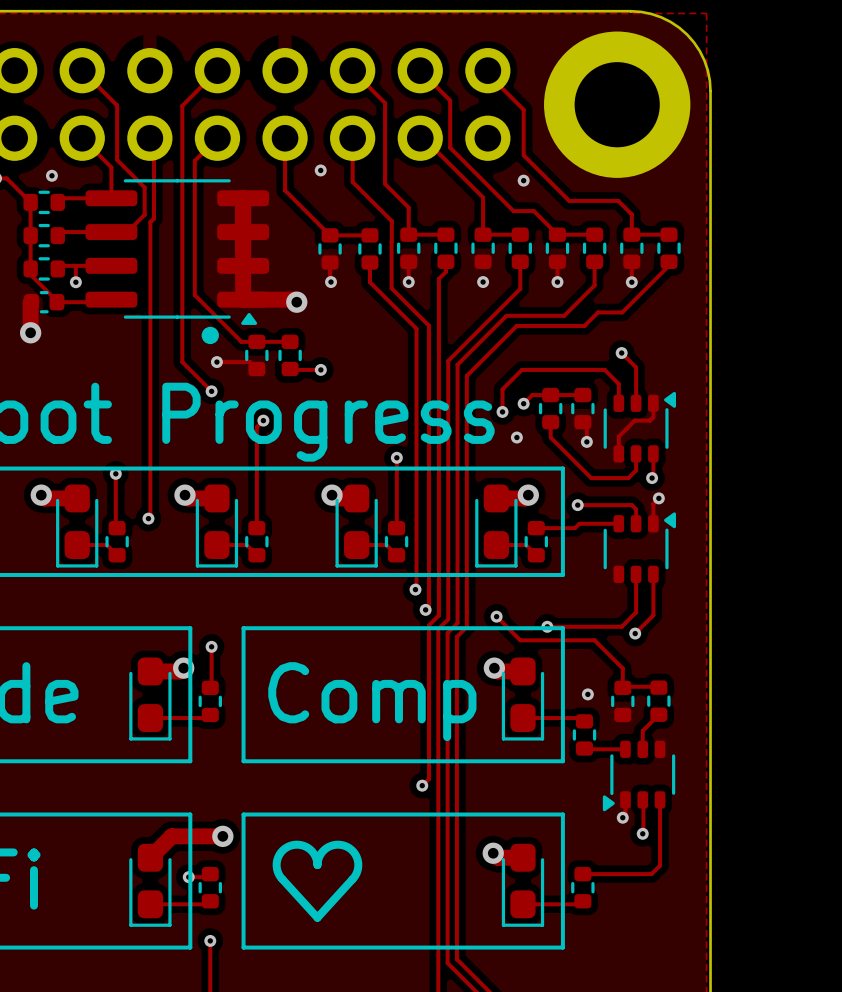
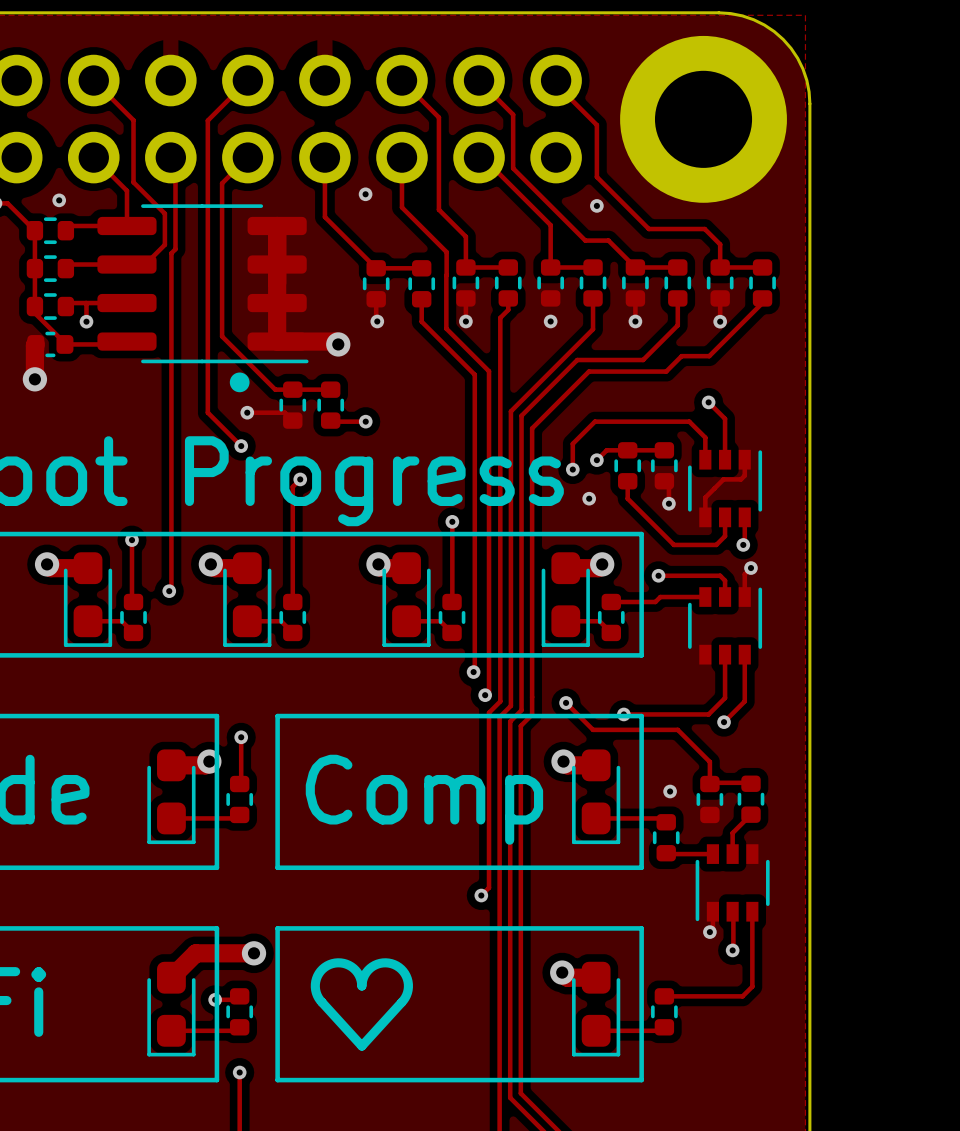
part footprint: [85, 179, 270, 325] -> [97, 204, 309, 364]
part footprint: [603, 391, 677, 463] -> [688, 449, 763, 528]
part footprint: [603, 512, 677, 583] -> [688, 587, 763, 665]
part footprint: [602, 740, 676, 812] -> [695, 844, 770, 922]

